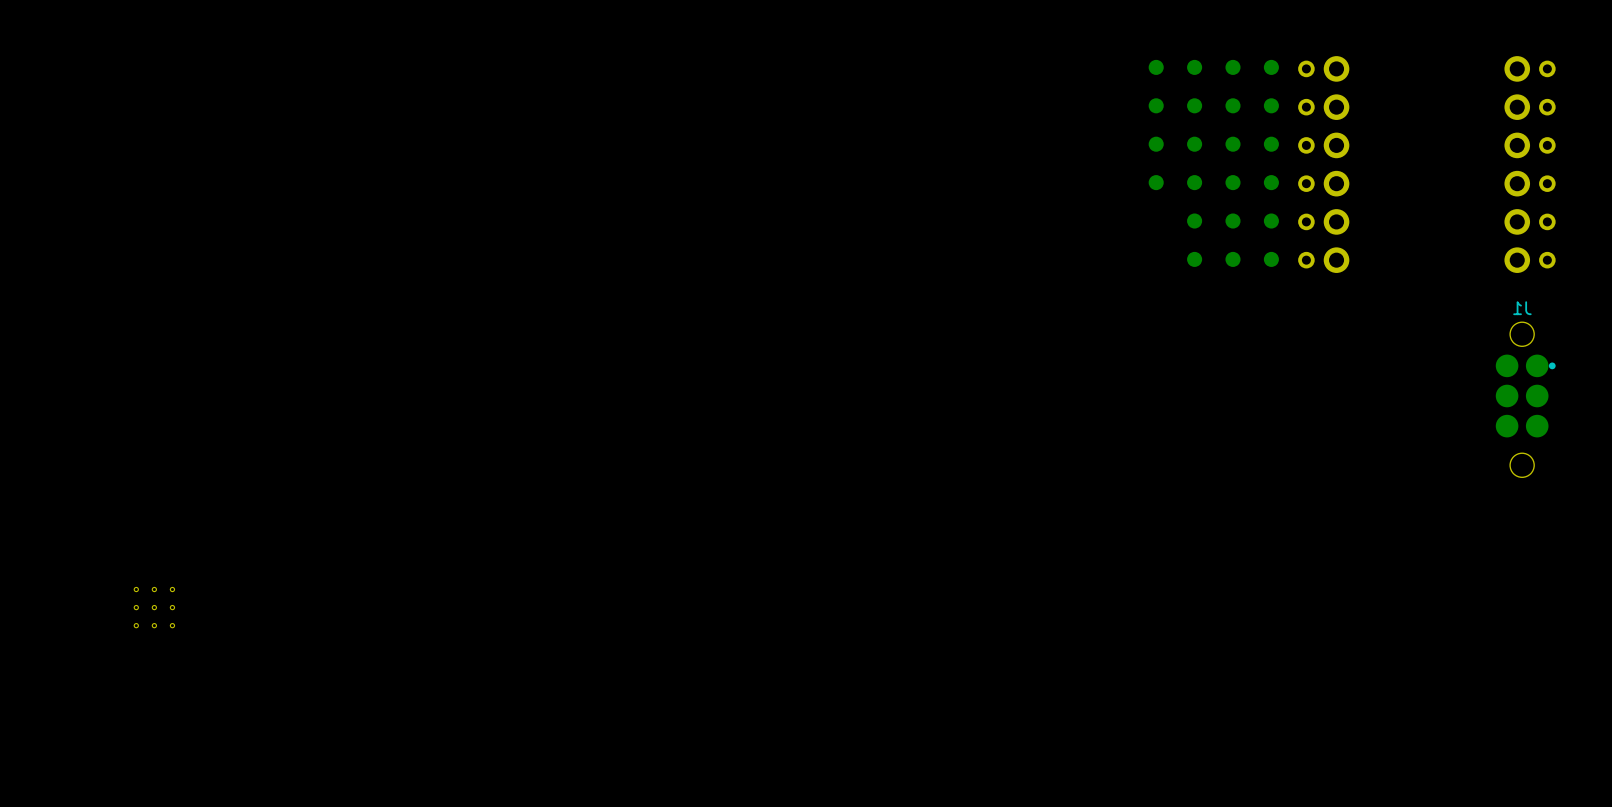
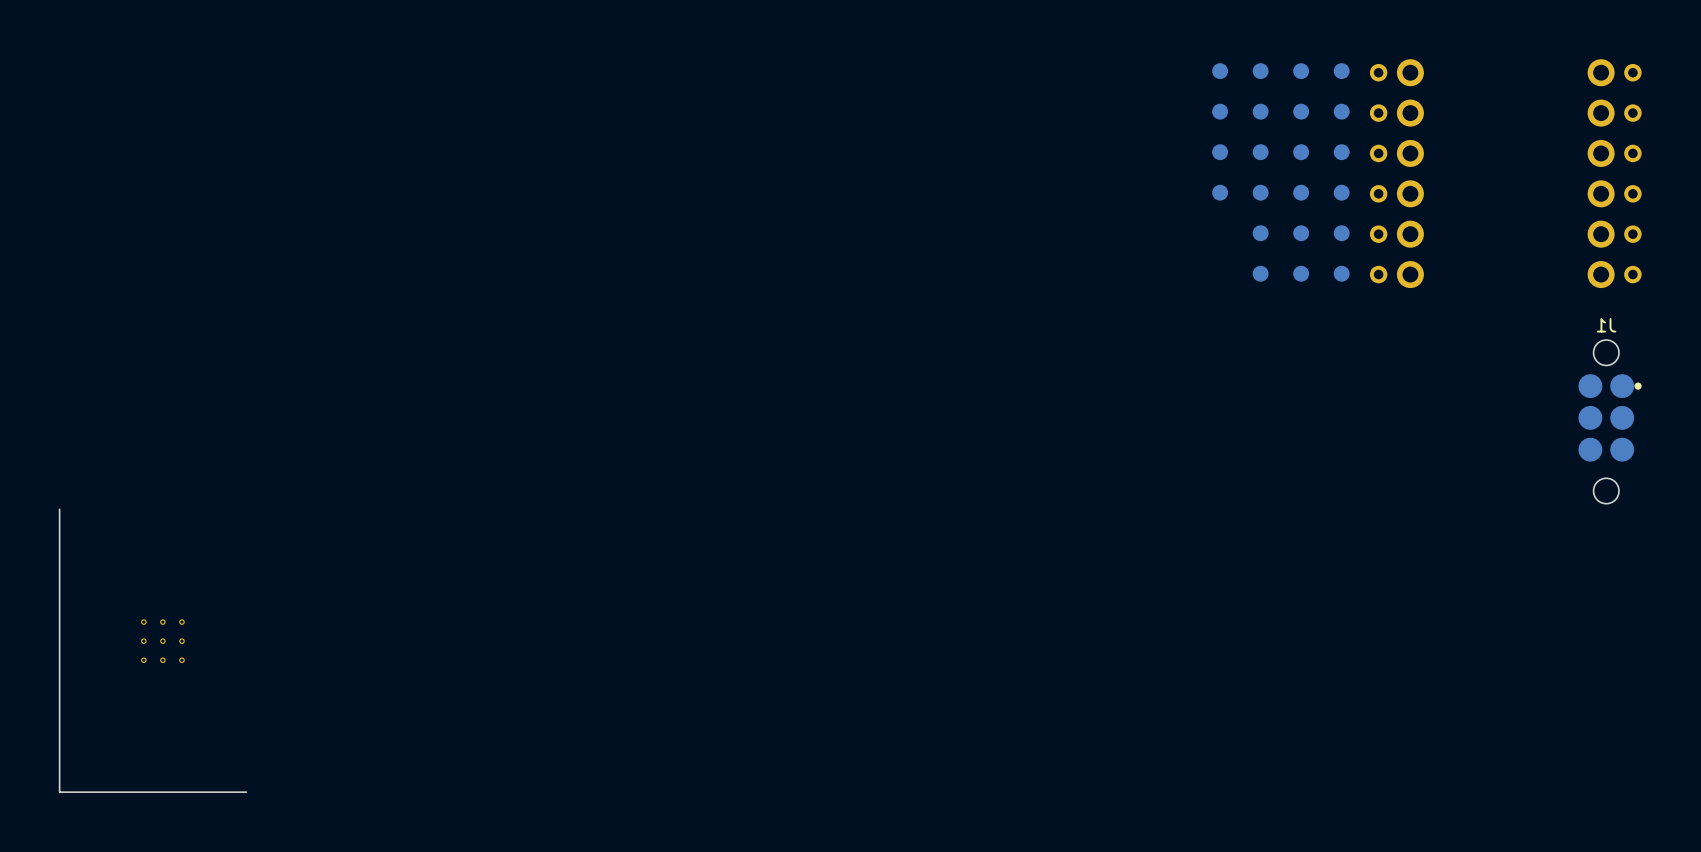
board edge: none -> (59, 509) (59, 792) (246, 792)

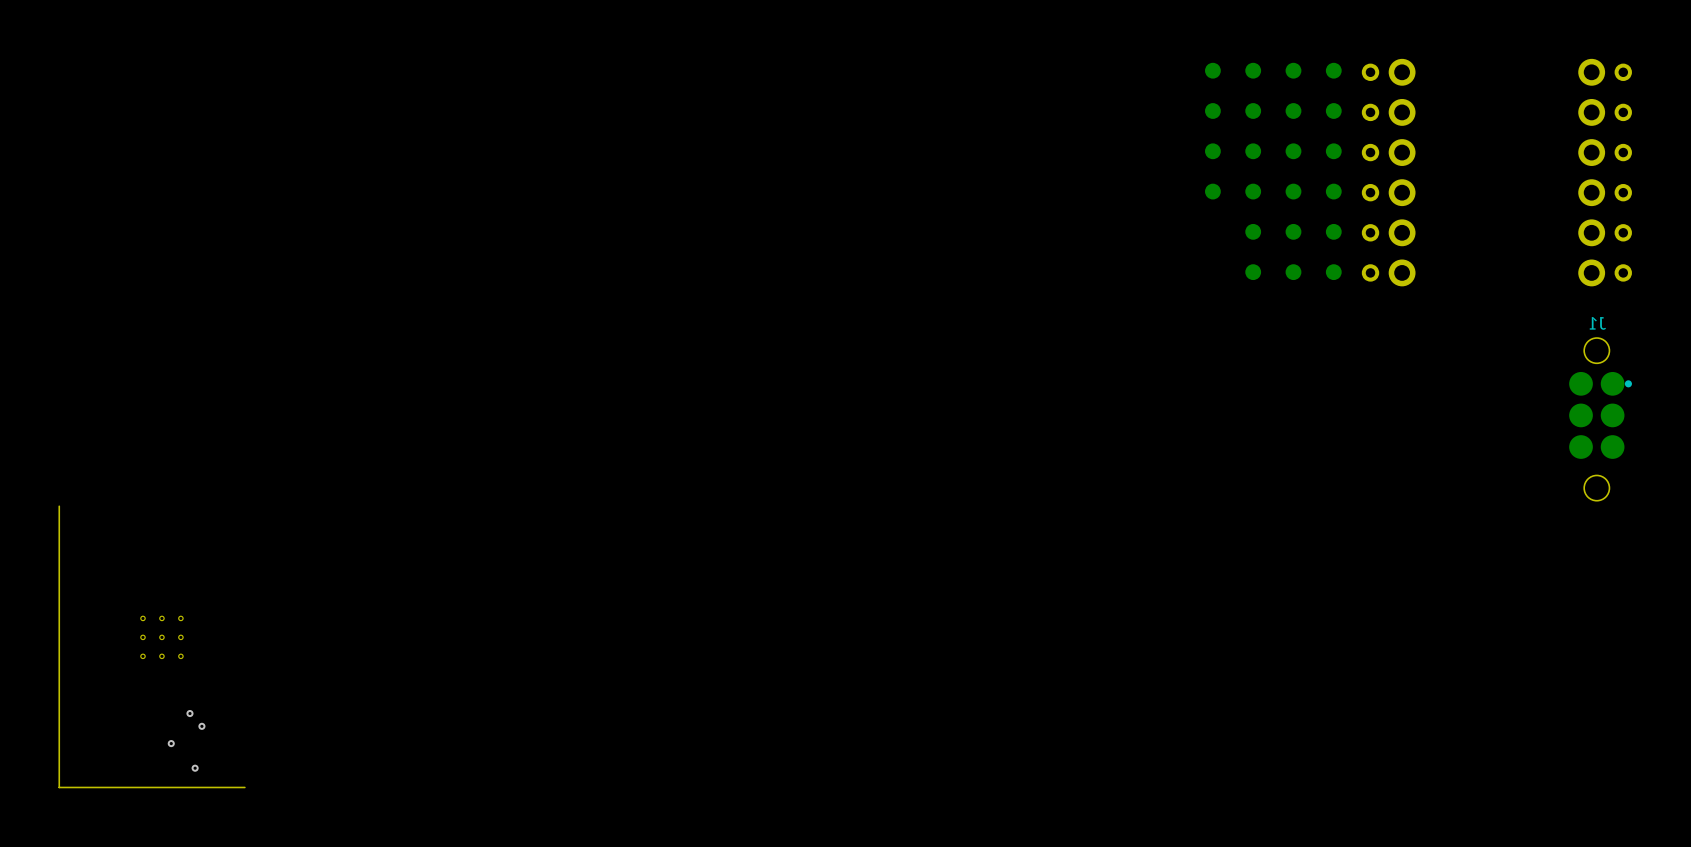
via: none -> (189, 713)
via: none -> (201, 726)
via: none -> (171, 743)
via: none -> (195, 768)

